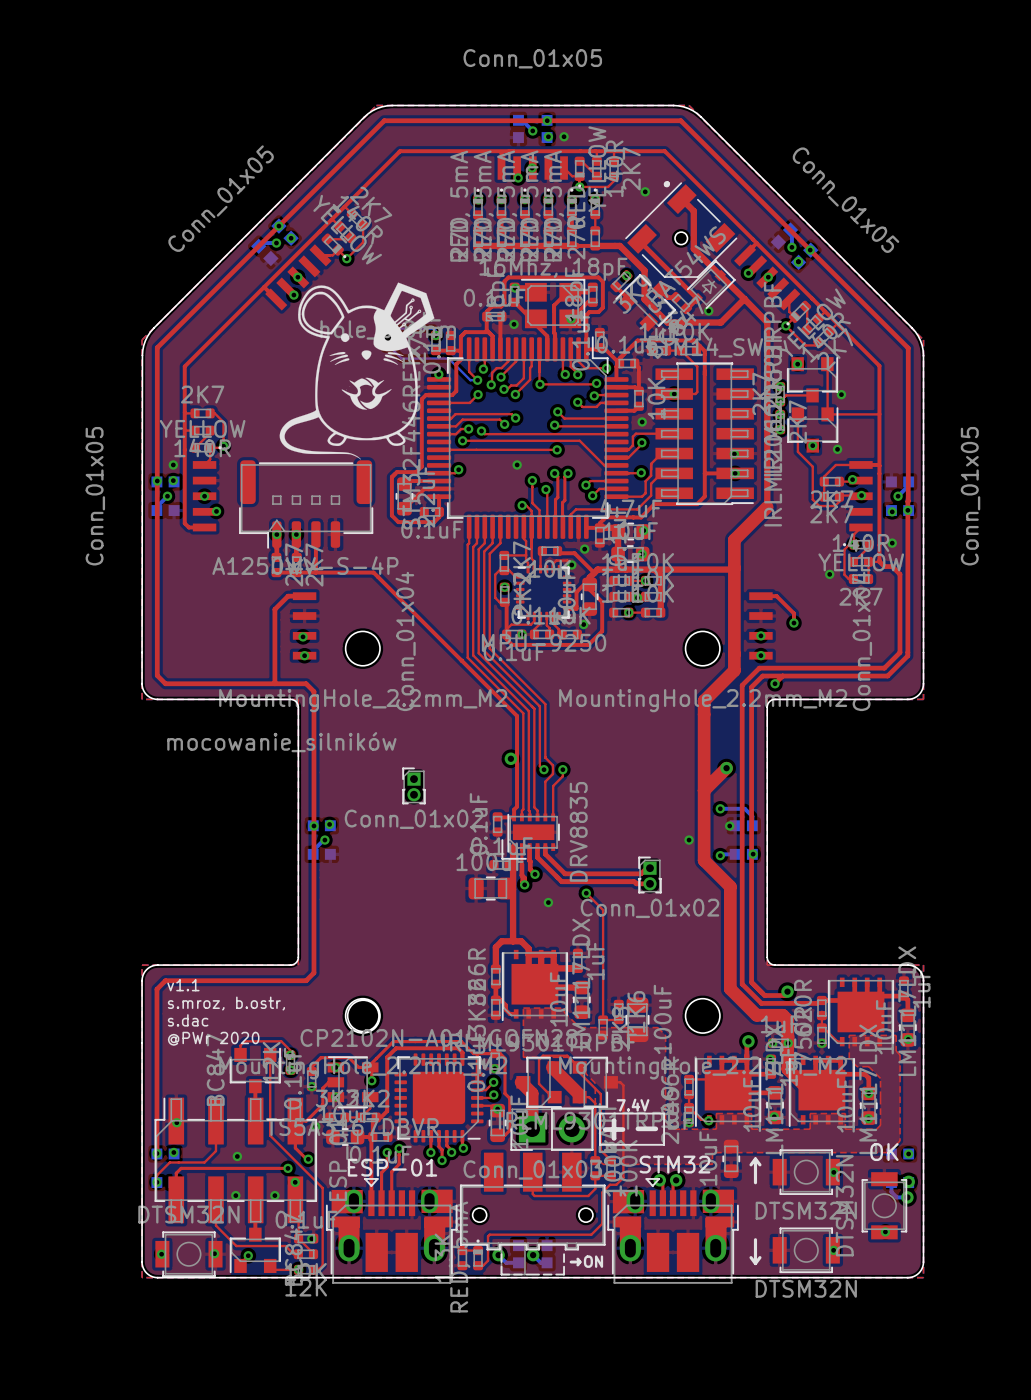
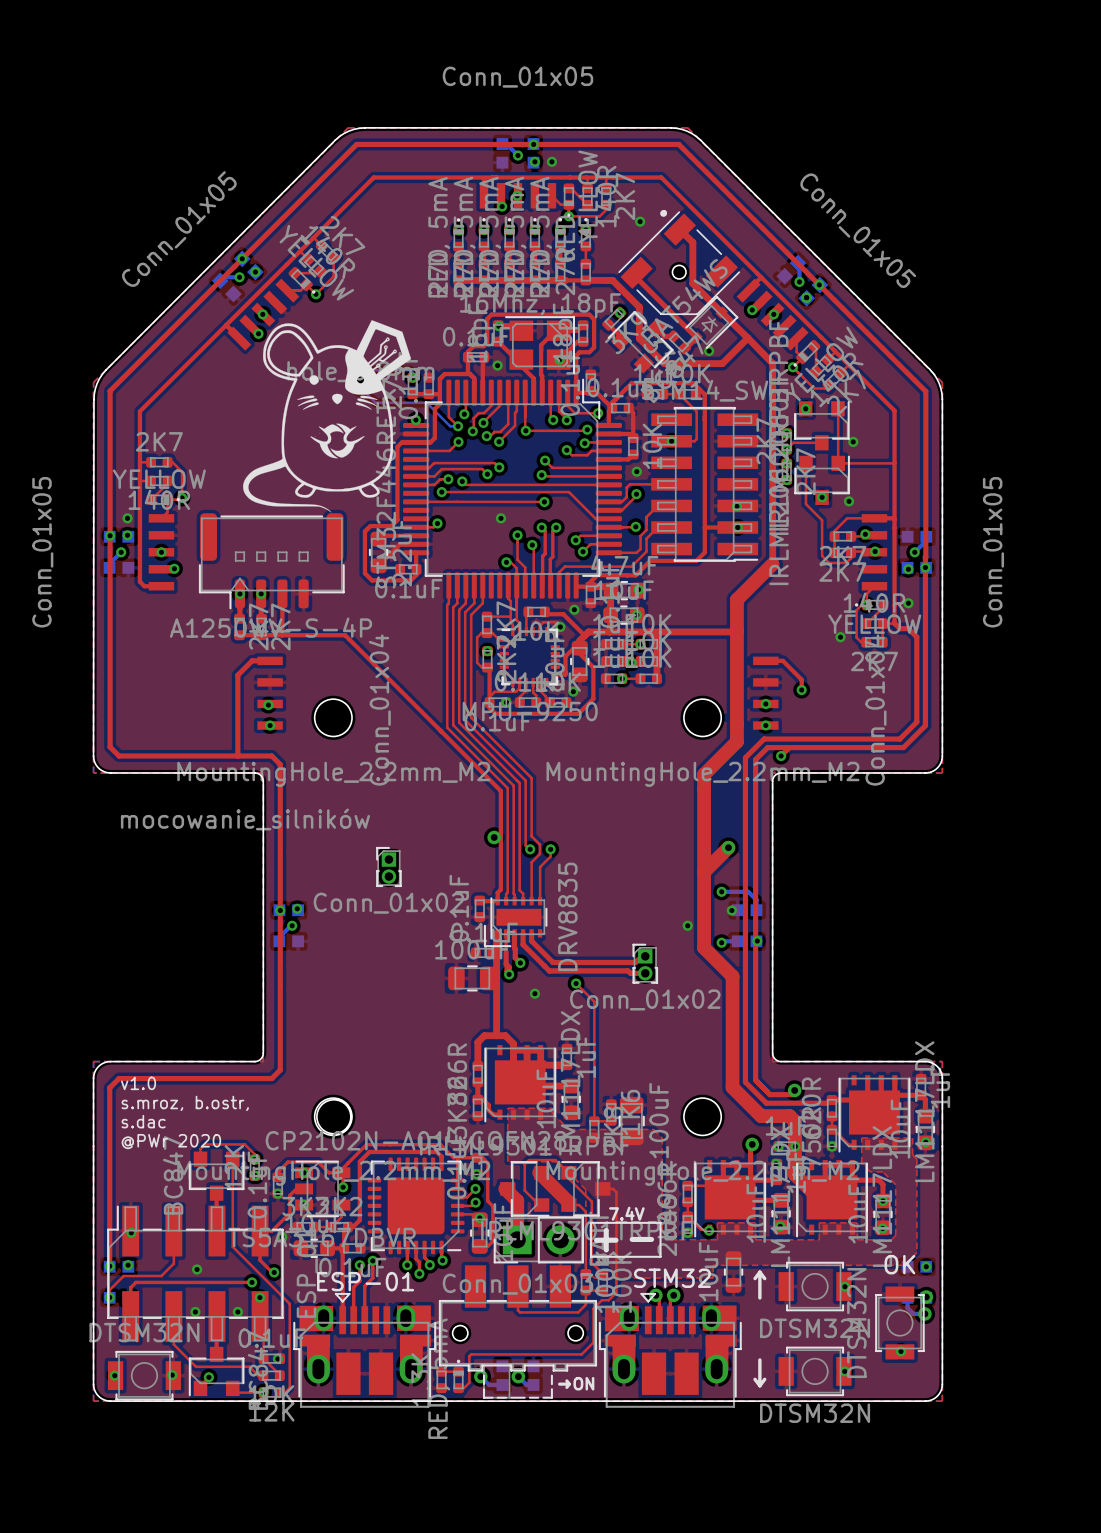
text: v1.1 (183, 985) -> v1.0 (138, 1083)

